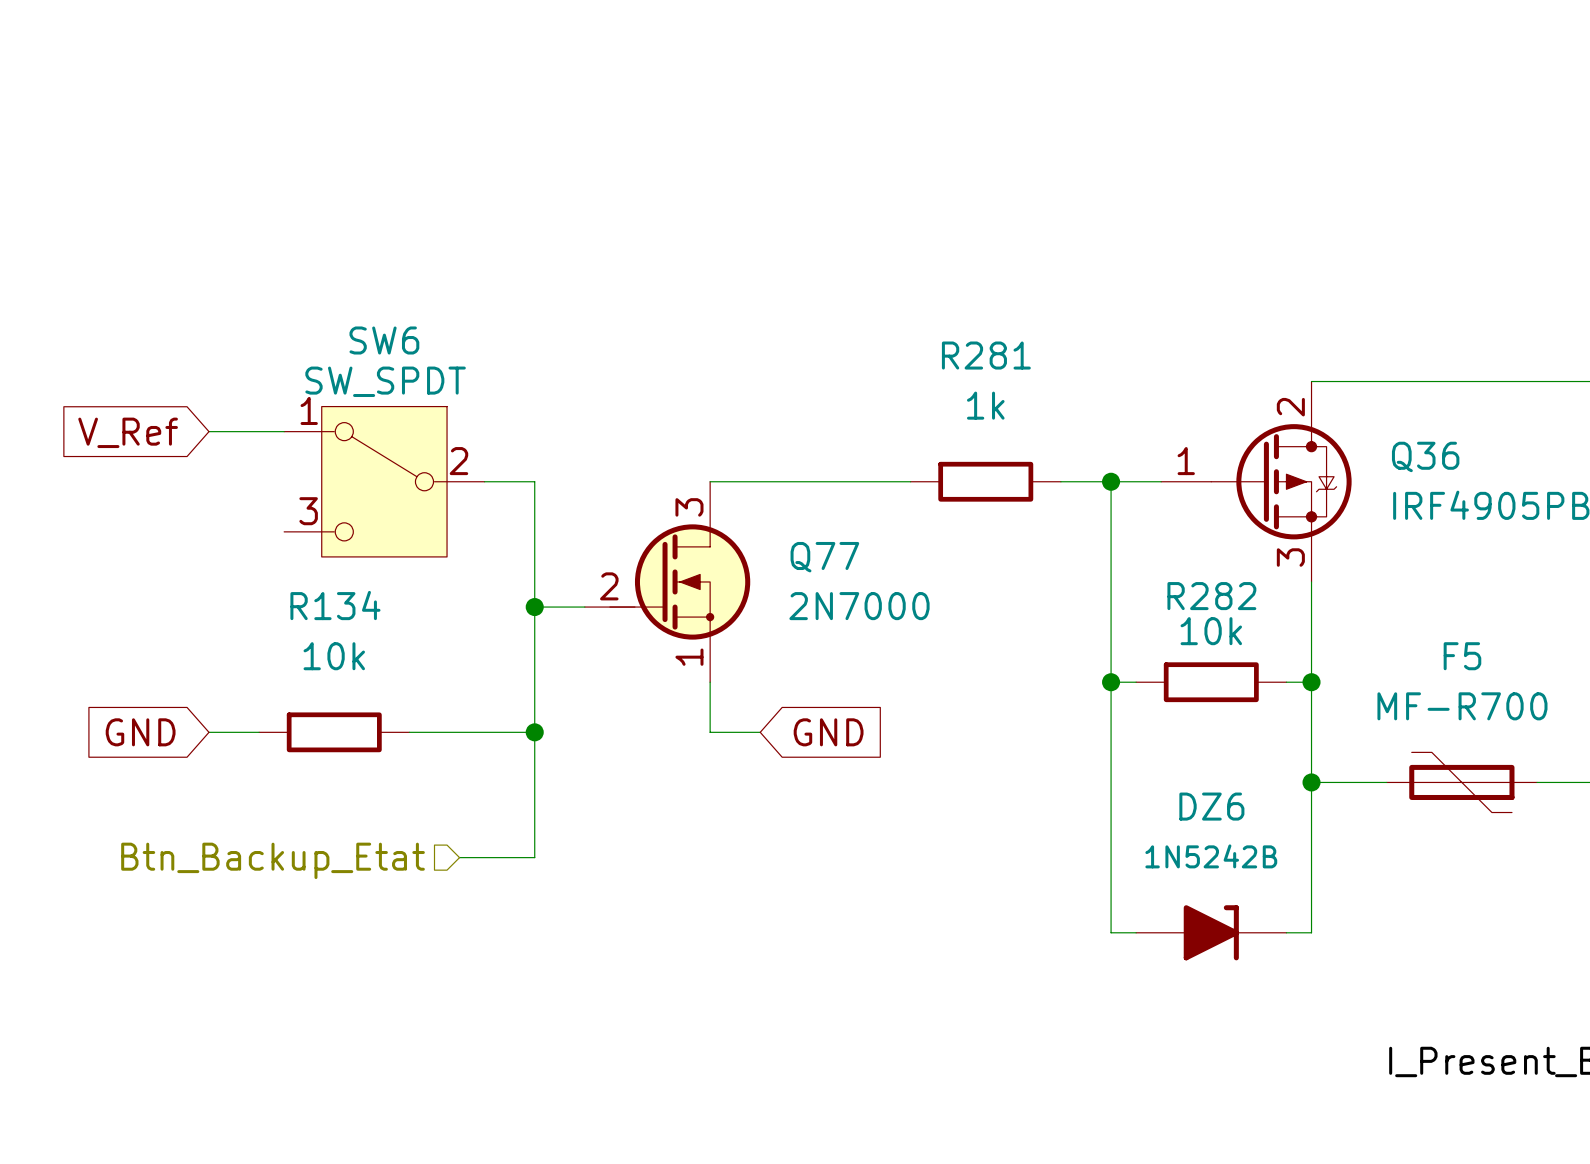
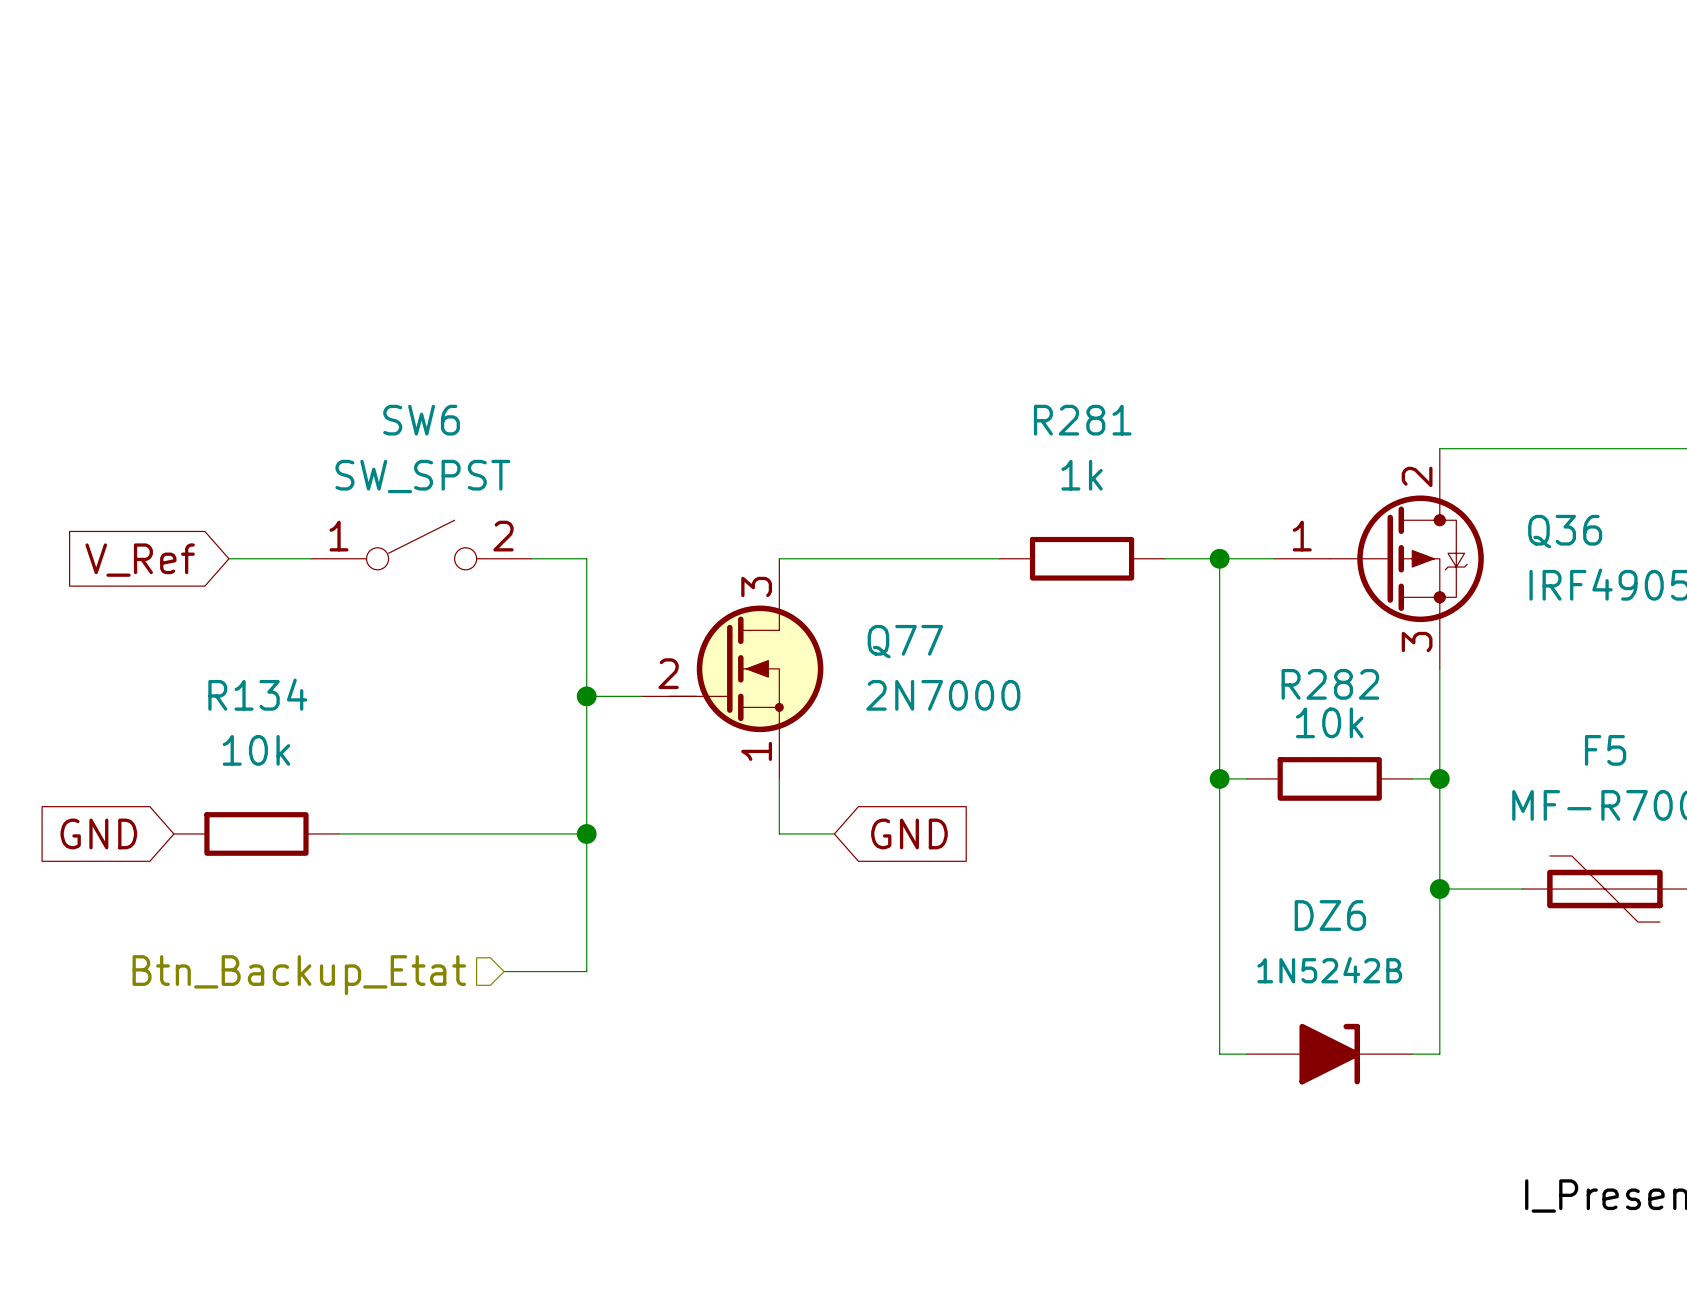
SW6 value: SW_SPDT (385, 381) -> SW_SPST (422, 476)
SW6 symbol: [284, 406, 485, 557] -> [311, 520, 532, 570]
wire: (208, 431) (284, 431) -> (228, 558) (311, 558)
global label position: V_Ref (128, 432) -> V_Ref (140, 560)
global label position: GND (140, 732) -> GND (98, 833)
wire: (208, 732) (259, 732) -> none
wire: none -> (339, 833) (449, 833)
R134 position: (334, 732) -> (256, 833)

